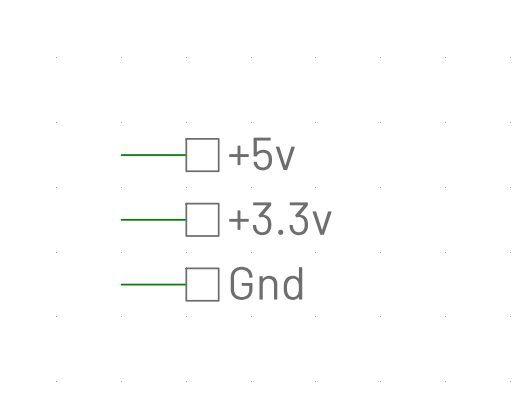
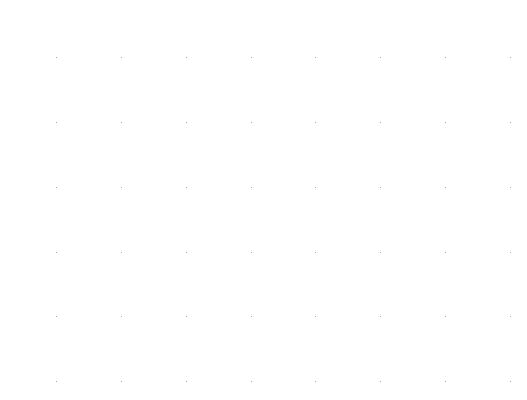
hierarchical label: +5v (262, 154) -> none
wire: (121, 155) (186, 155) -> none
hierarchical label: +3.3v (280, 218) -> none
wire: (121, 219) (186, 219) -> none
hierarchical label: Gnd (266, 283) -> none
wire: (121, 284) (186, 284) -> none

